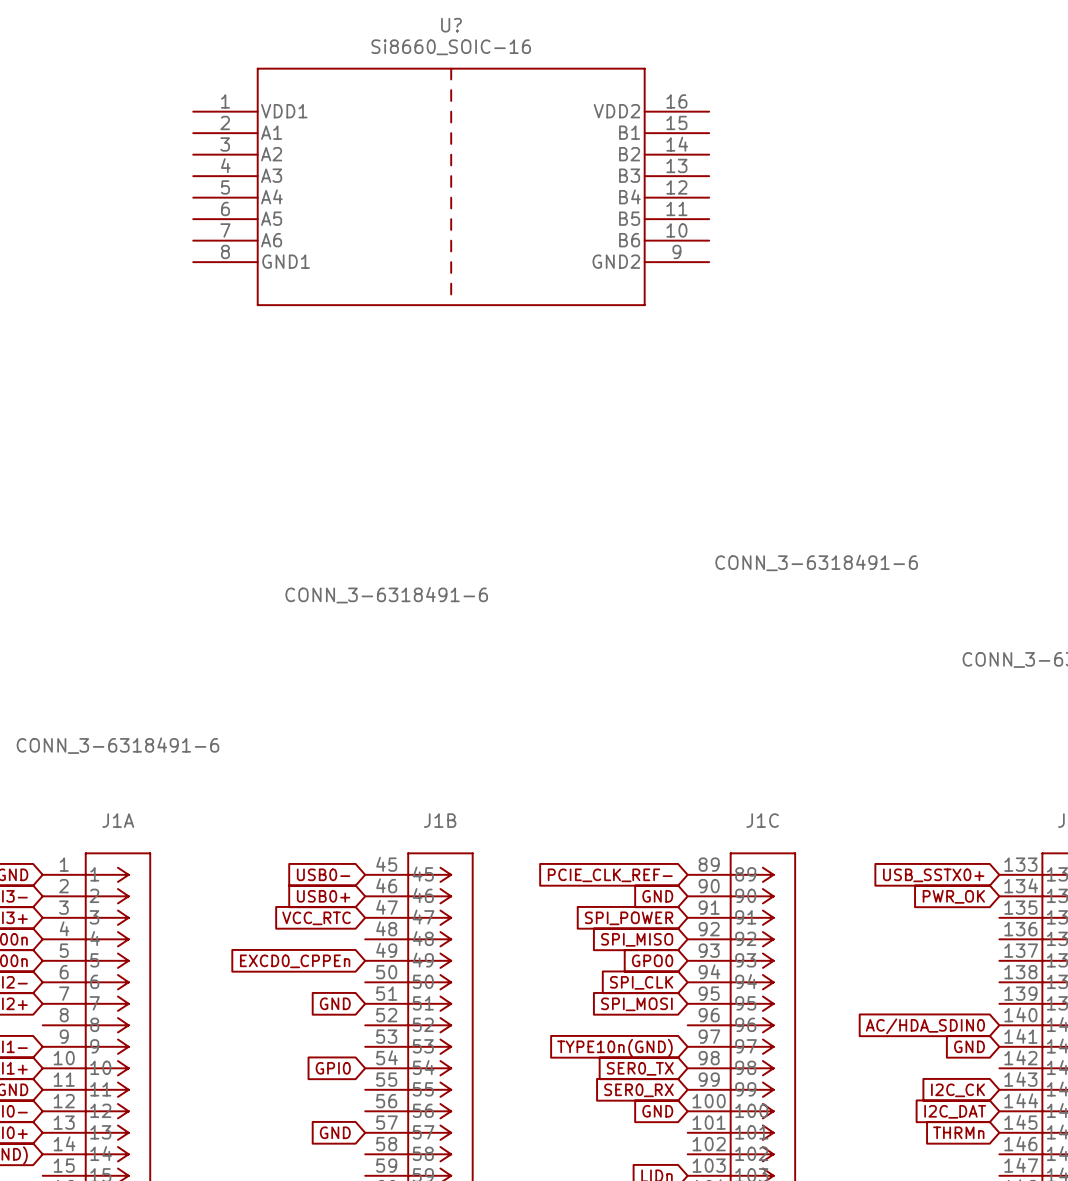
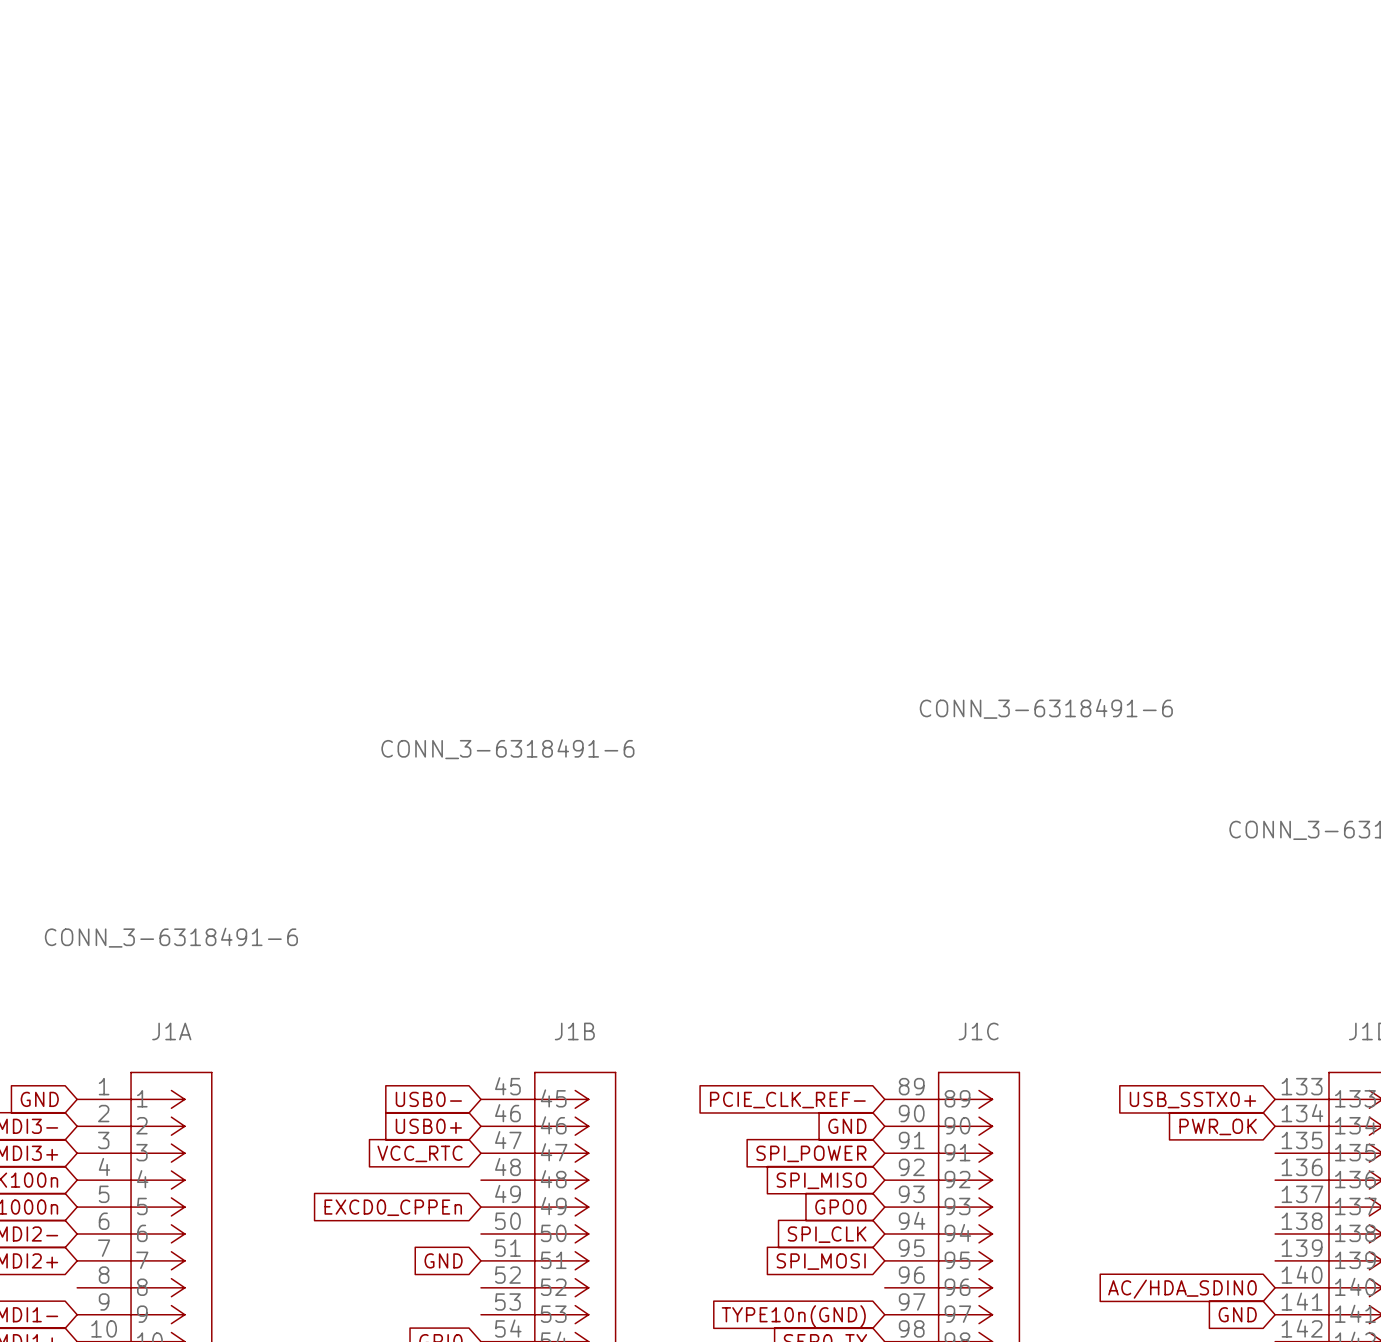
U?: Si8660_SOIC-16 (451, 186) -> none

